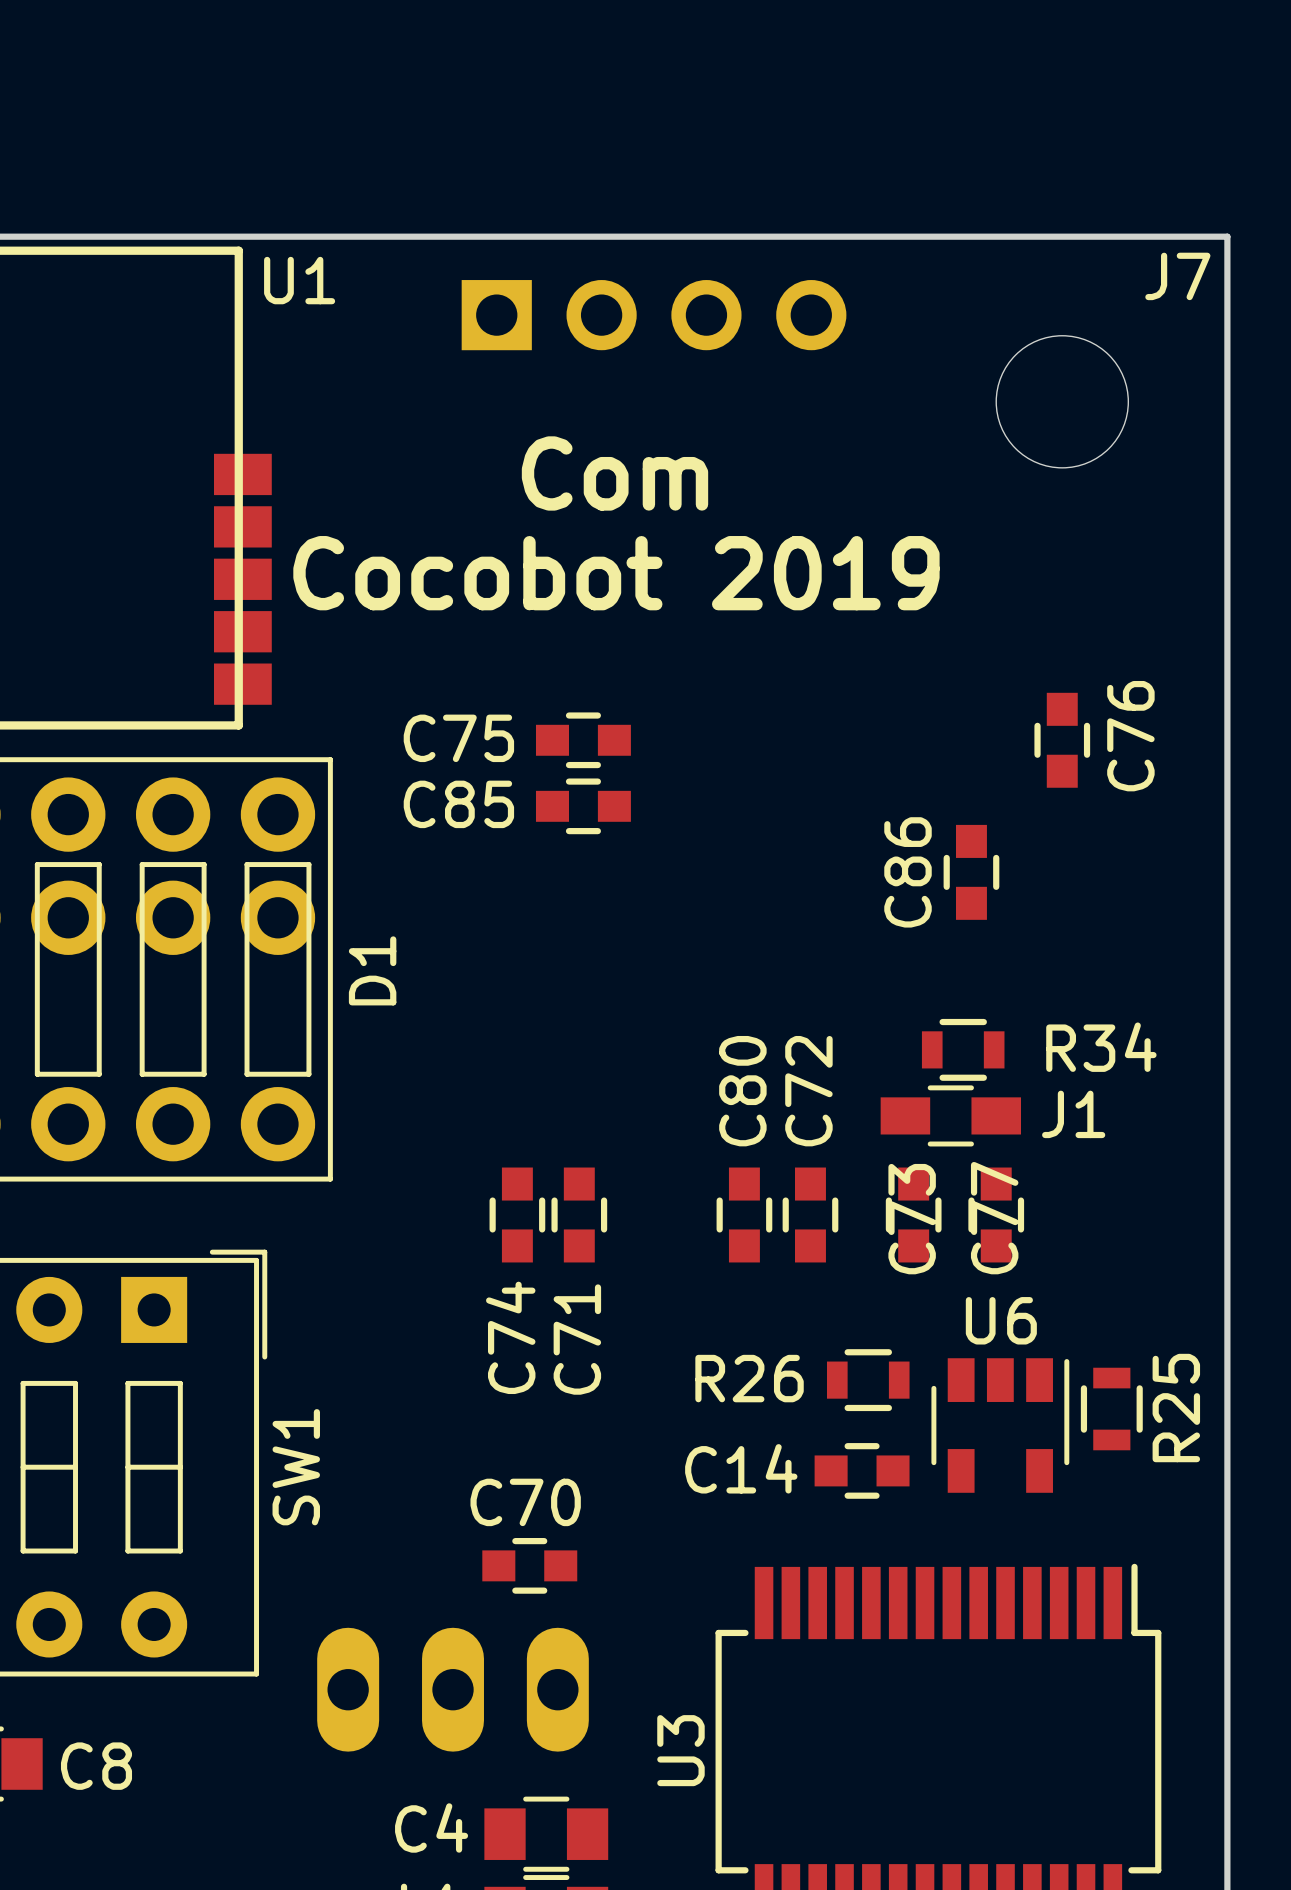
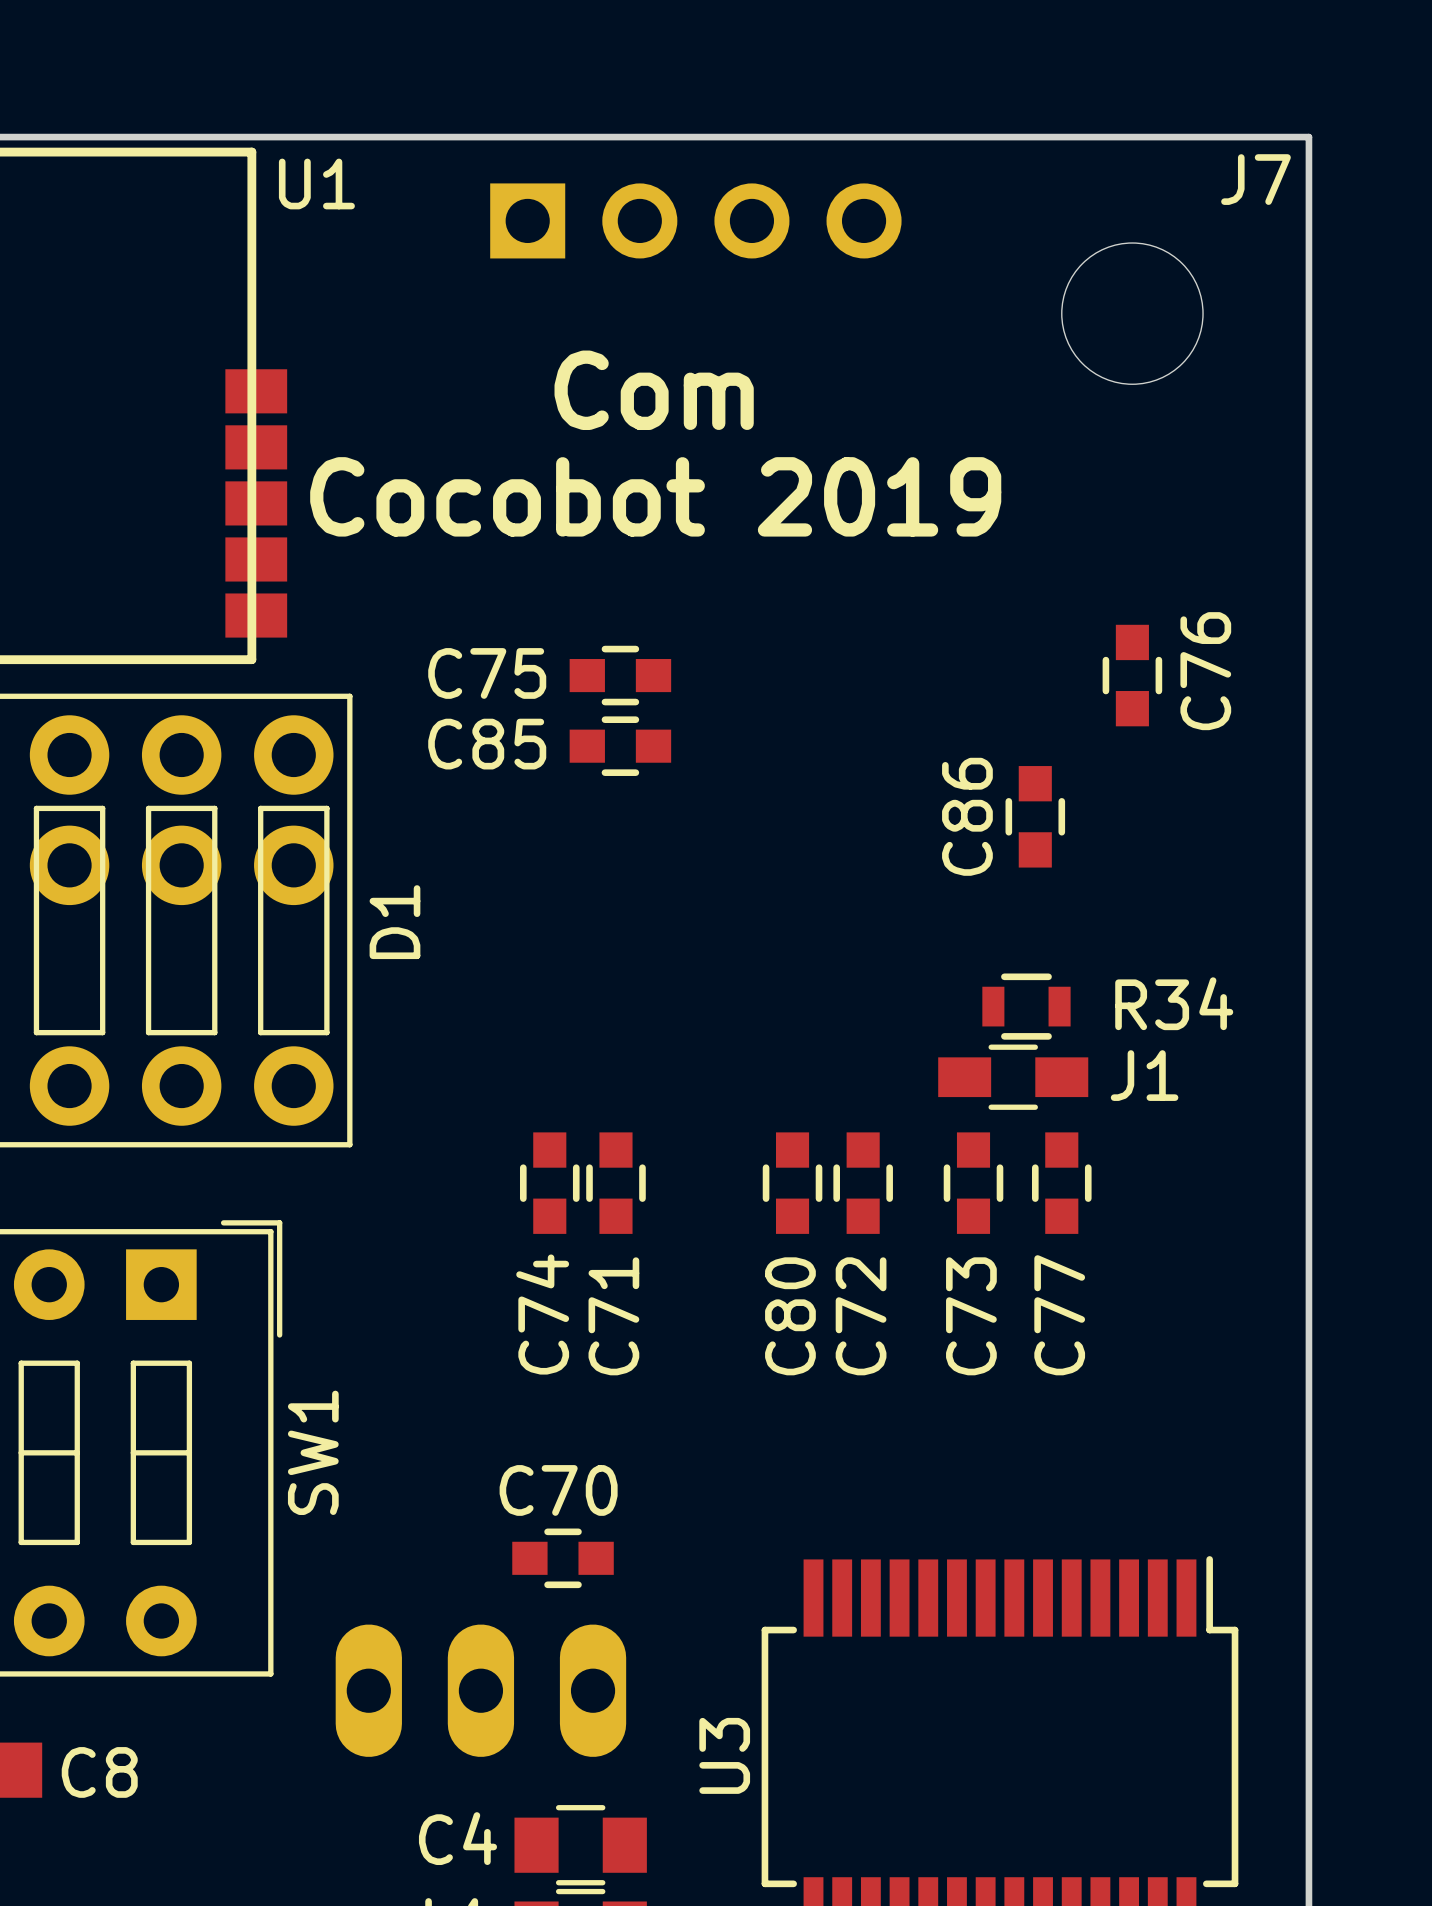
C80 name position: C80 (742, 1091) -> C80 (790, 1316)
C72 name position: C72 (808, 1091) -> C72 (861, 1316)
C77 name position: C77 (994, 1218) -> C77 (1059, 1315)
C73 name position: C73 (912, 1219) -> C73 (971, 1316)
R26: (868, 1380) -> none
R25: (1111, 1409) -> none
U6: (1000, 1425) -> none
C14: (862, 1470) -> none

